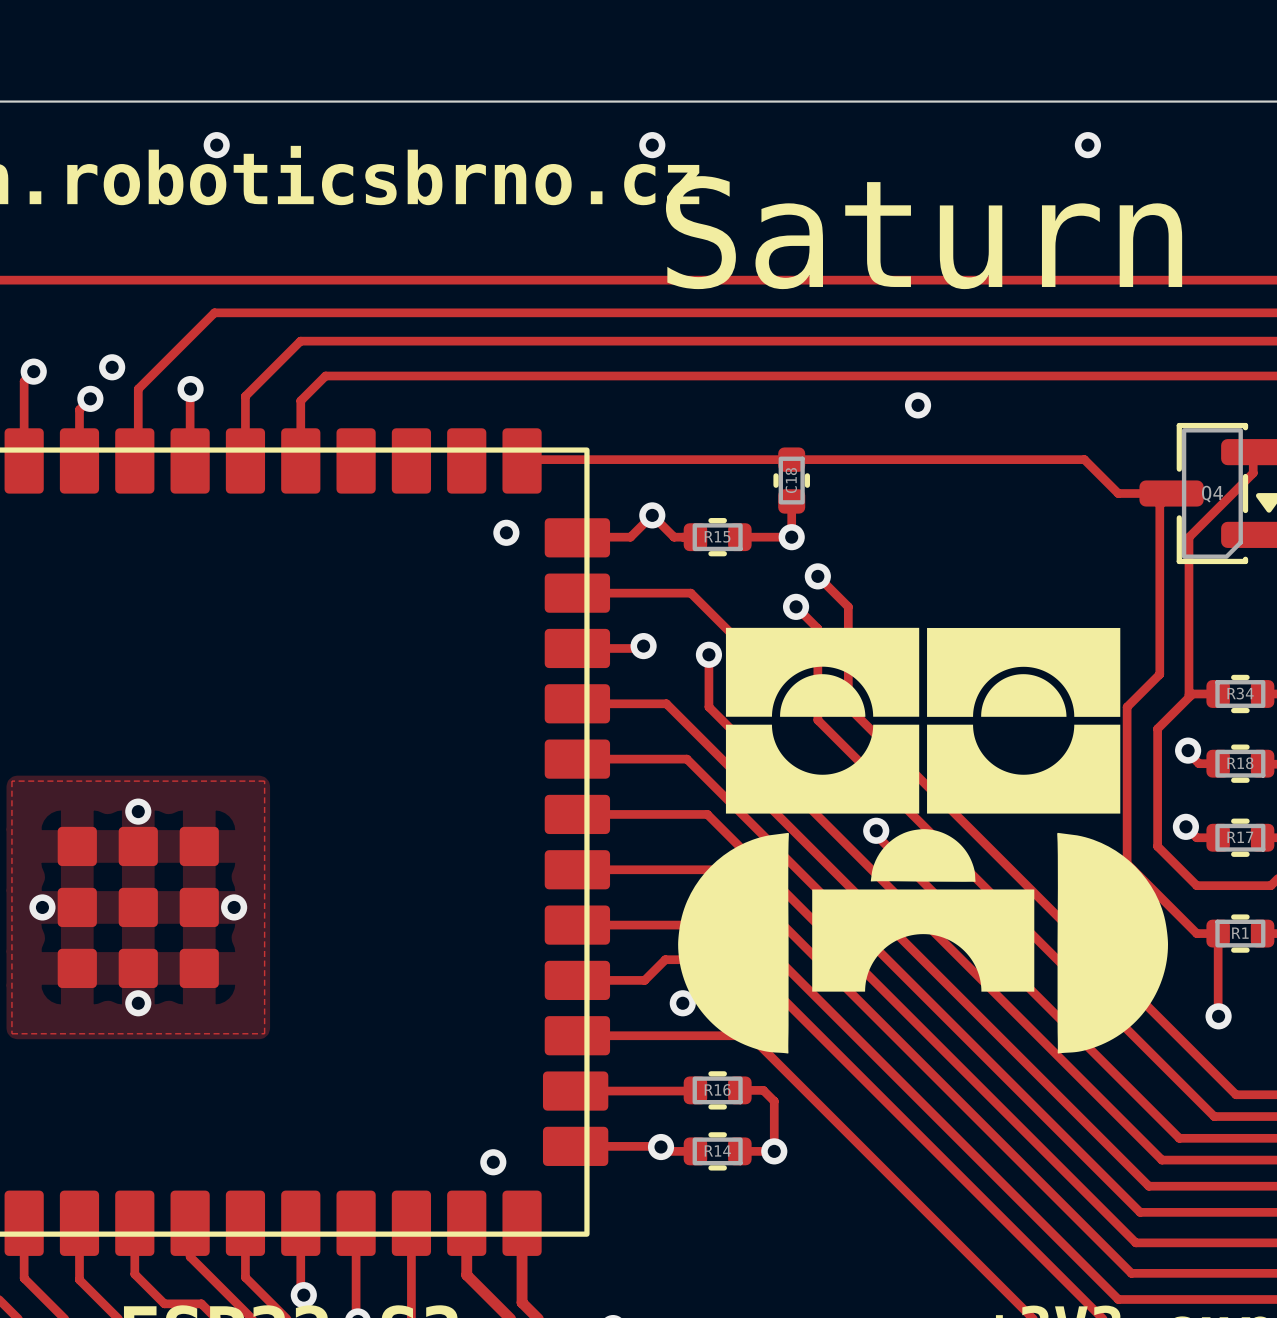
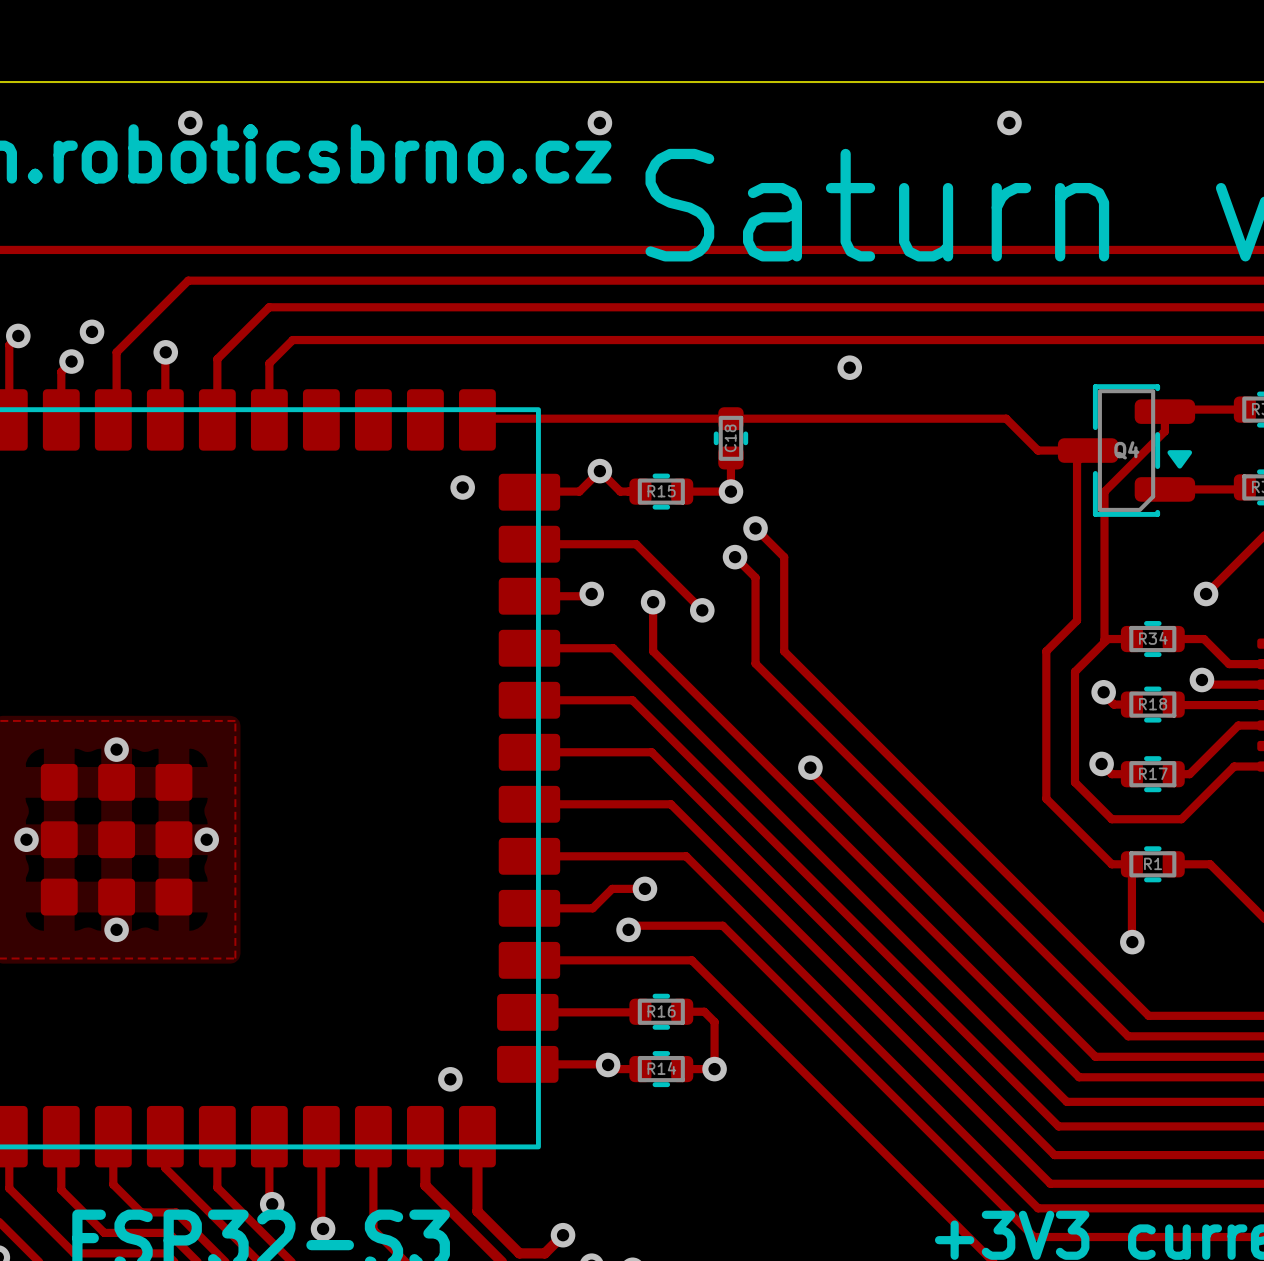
drawing: [678, 627, 1169, 1054] -> none

